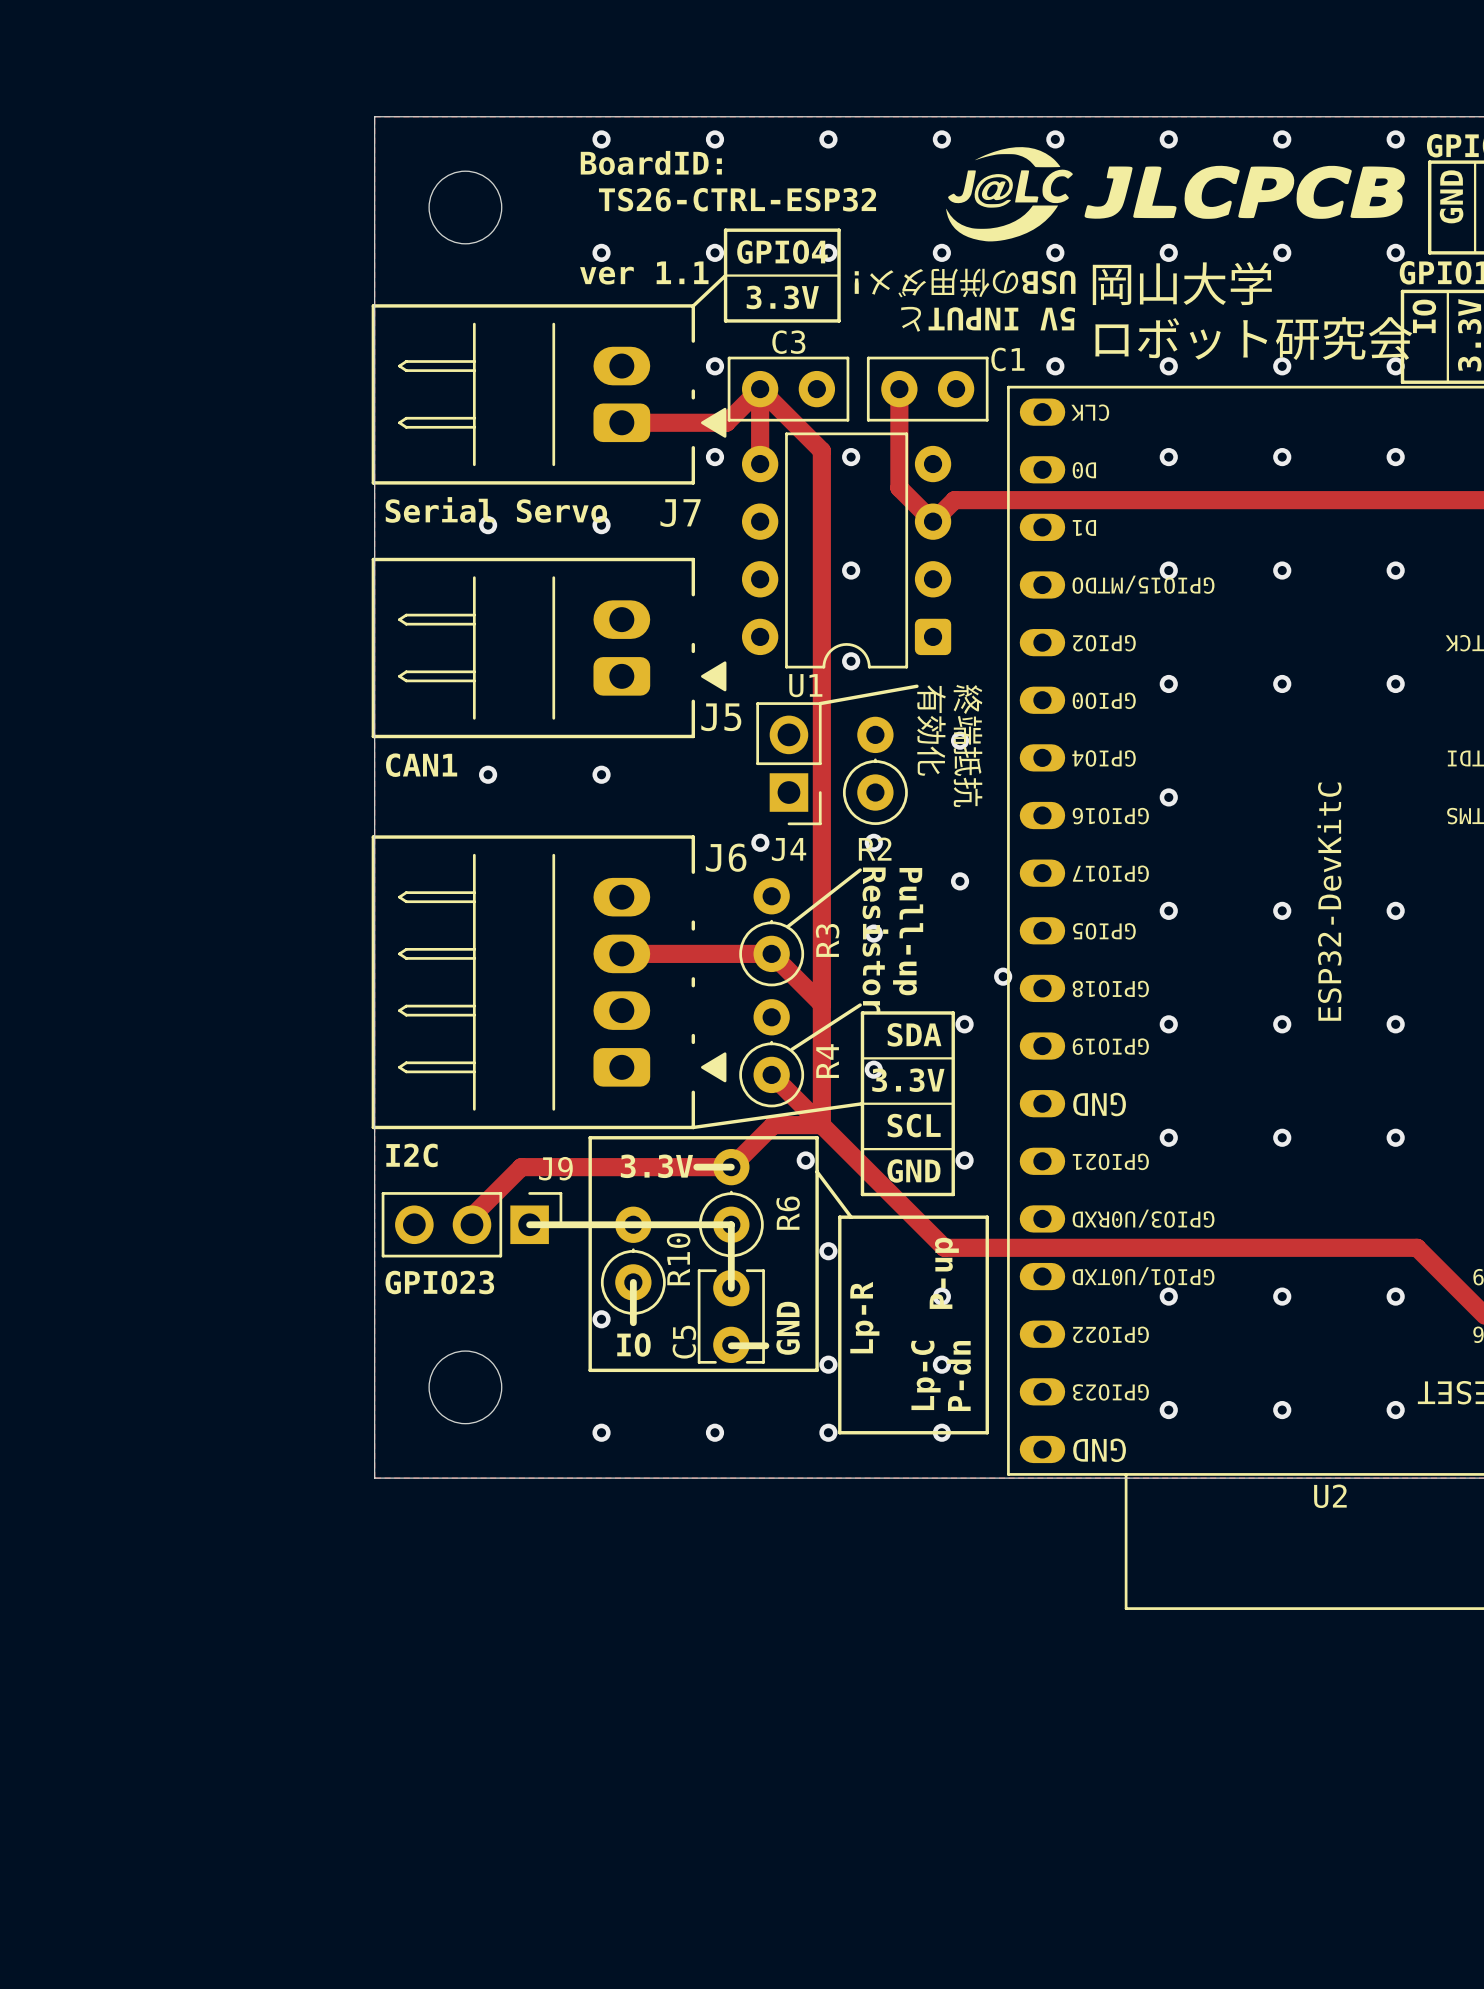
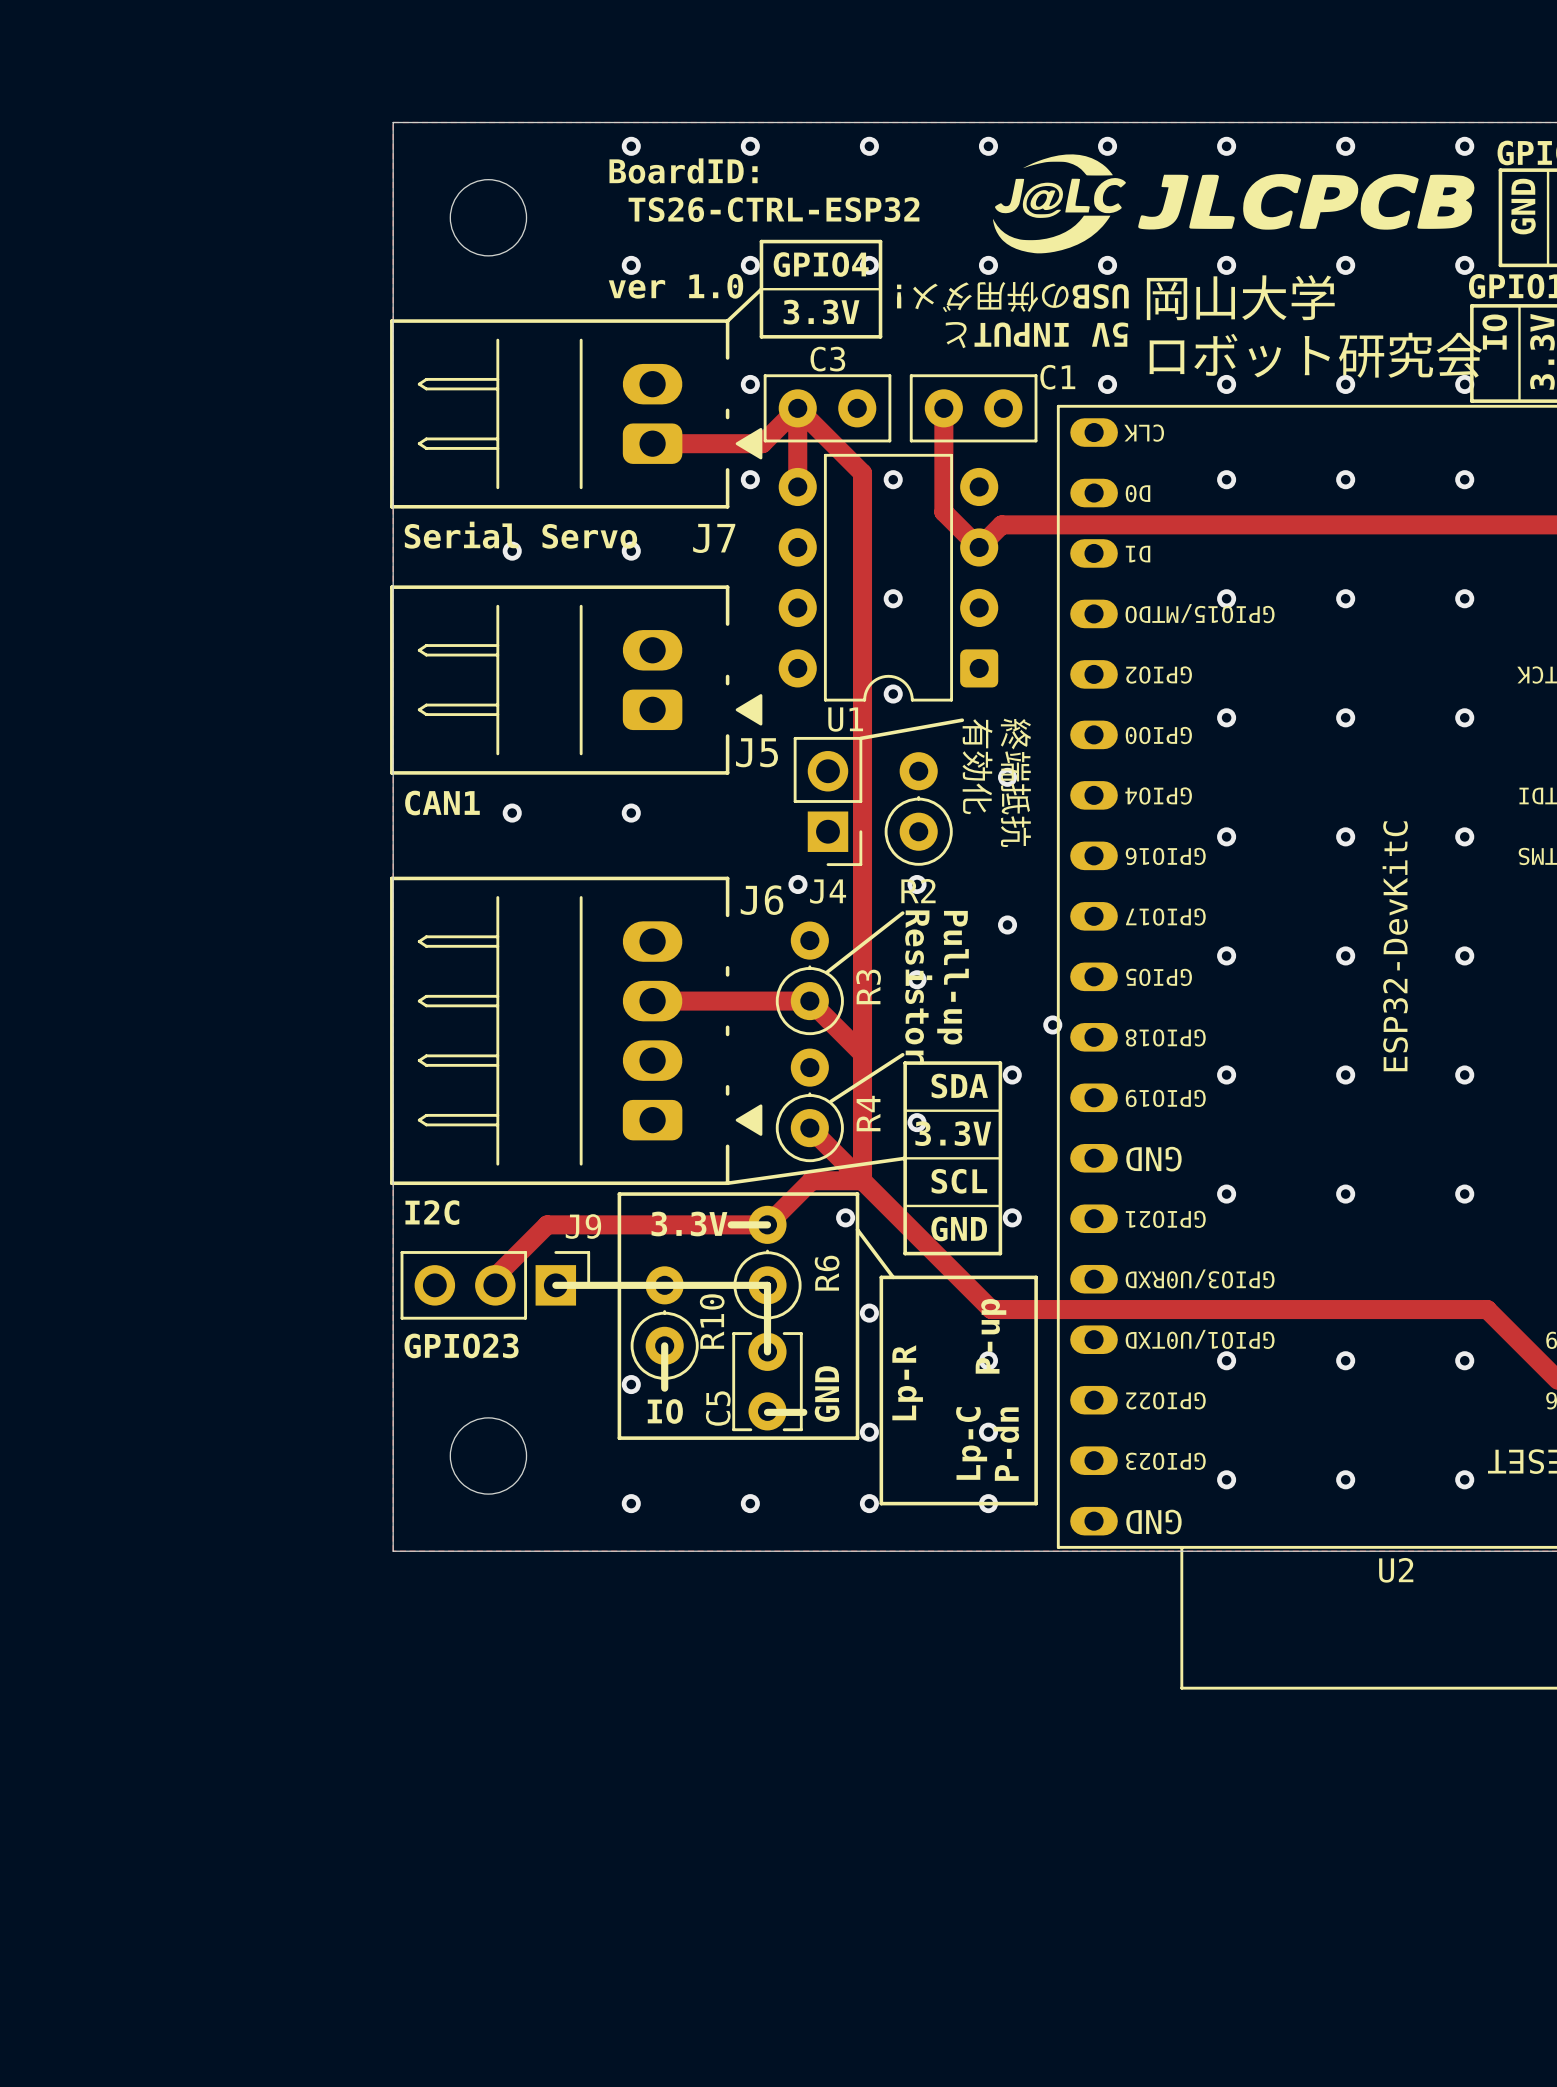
text: ver 1.1 (644, 273) -> ver 1.0 (675, 286)
via: none -> (1345, 836)
via: none -> (1464, 836)

